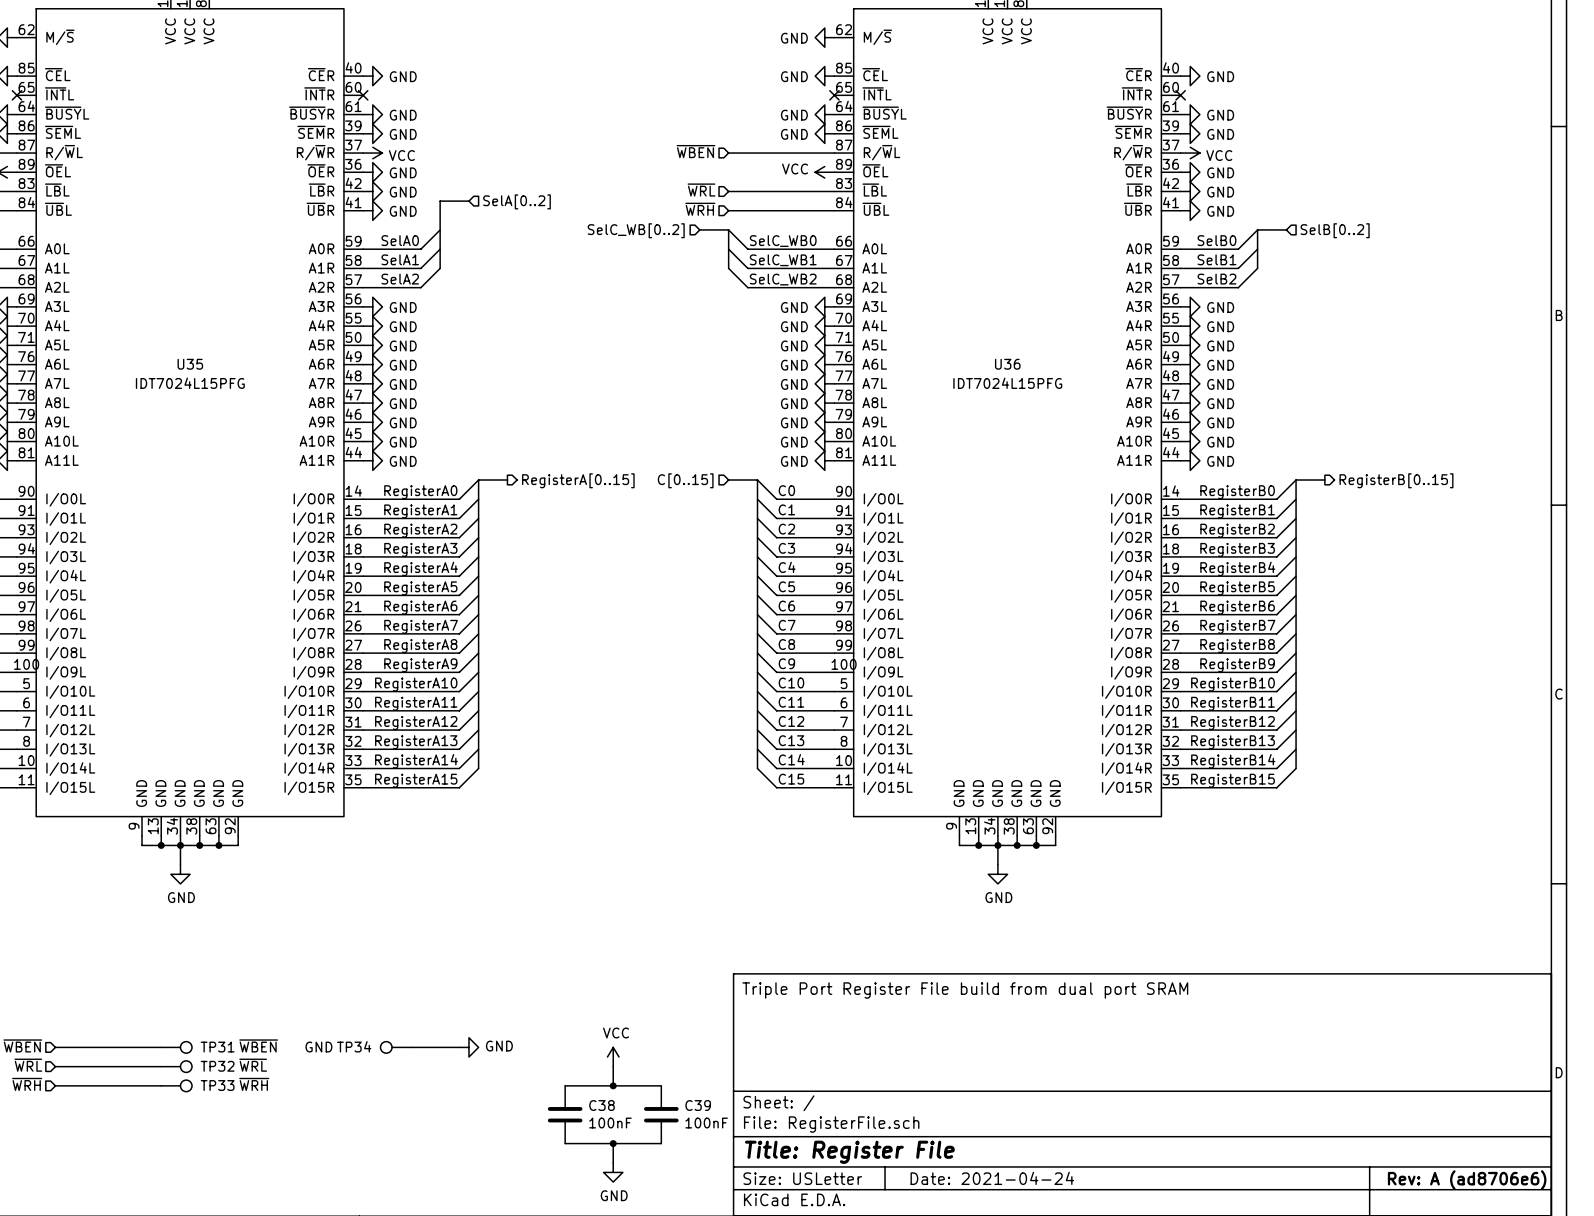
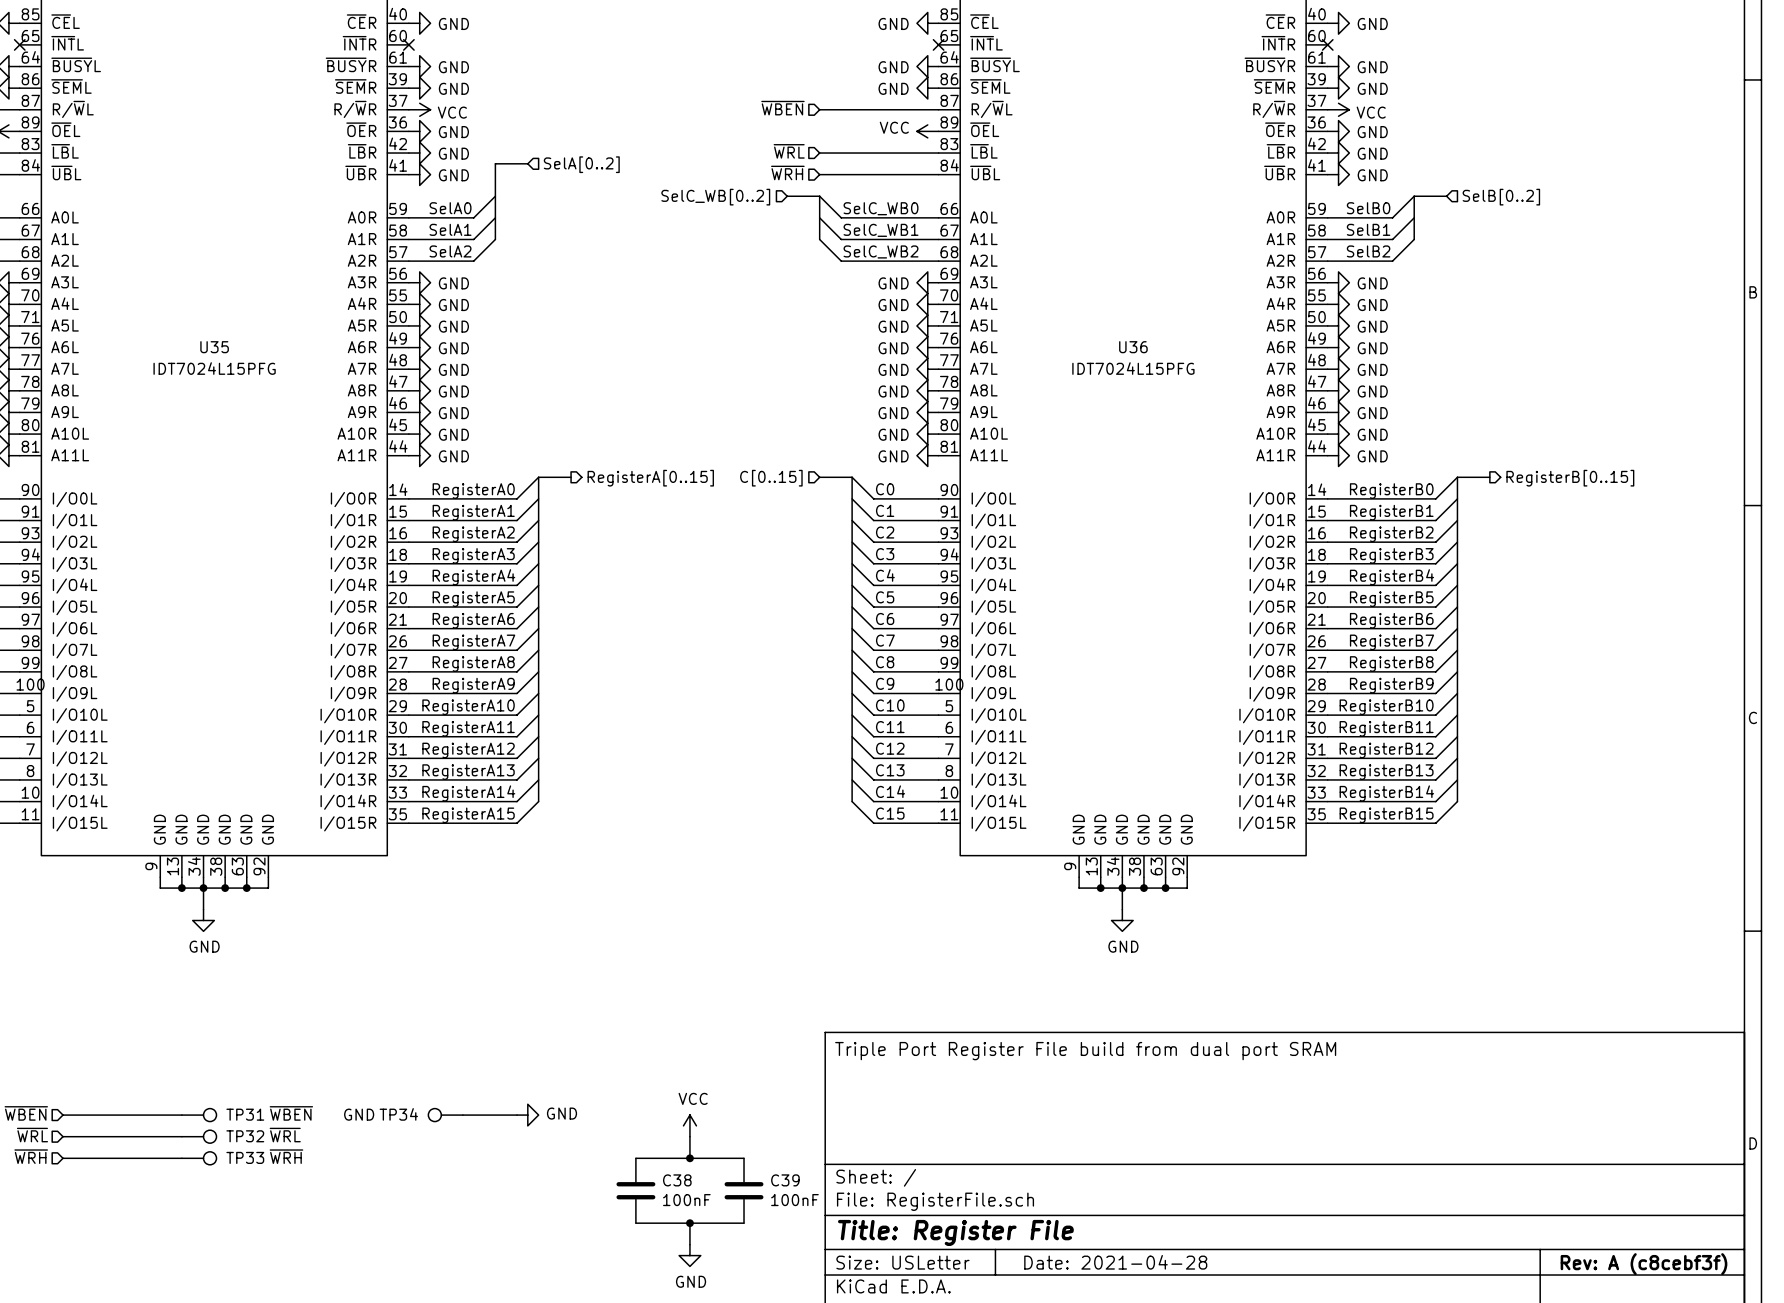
title block: Date: 2021-04-24 (992, 1178) -> Date: 2021-04-28 (1115, 1262)
title block: Rev: A (ad8706e6) (1467, 1180) -> Rev: A (c8cebf3f) (1644, 1264)

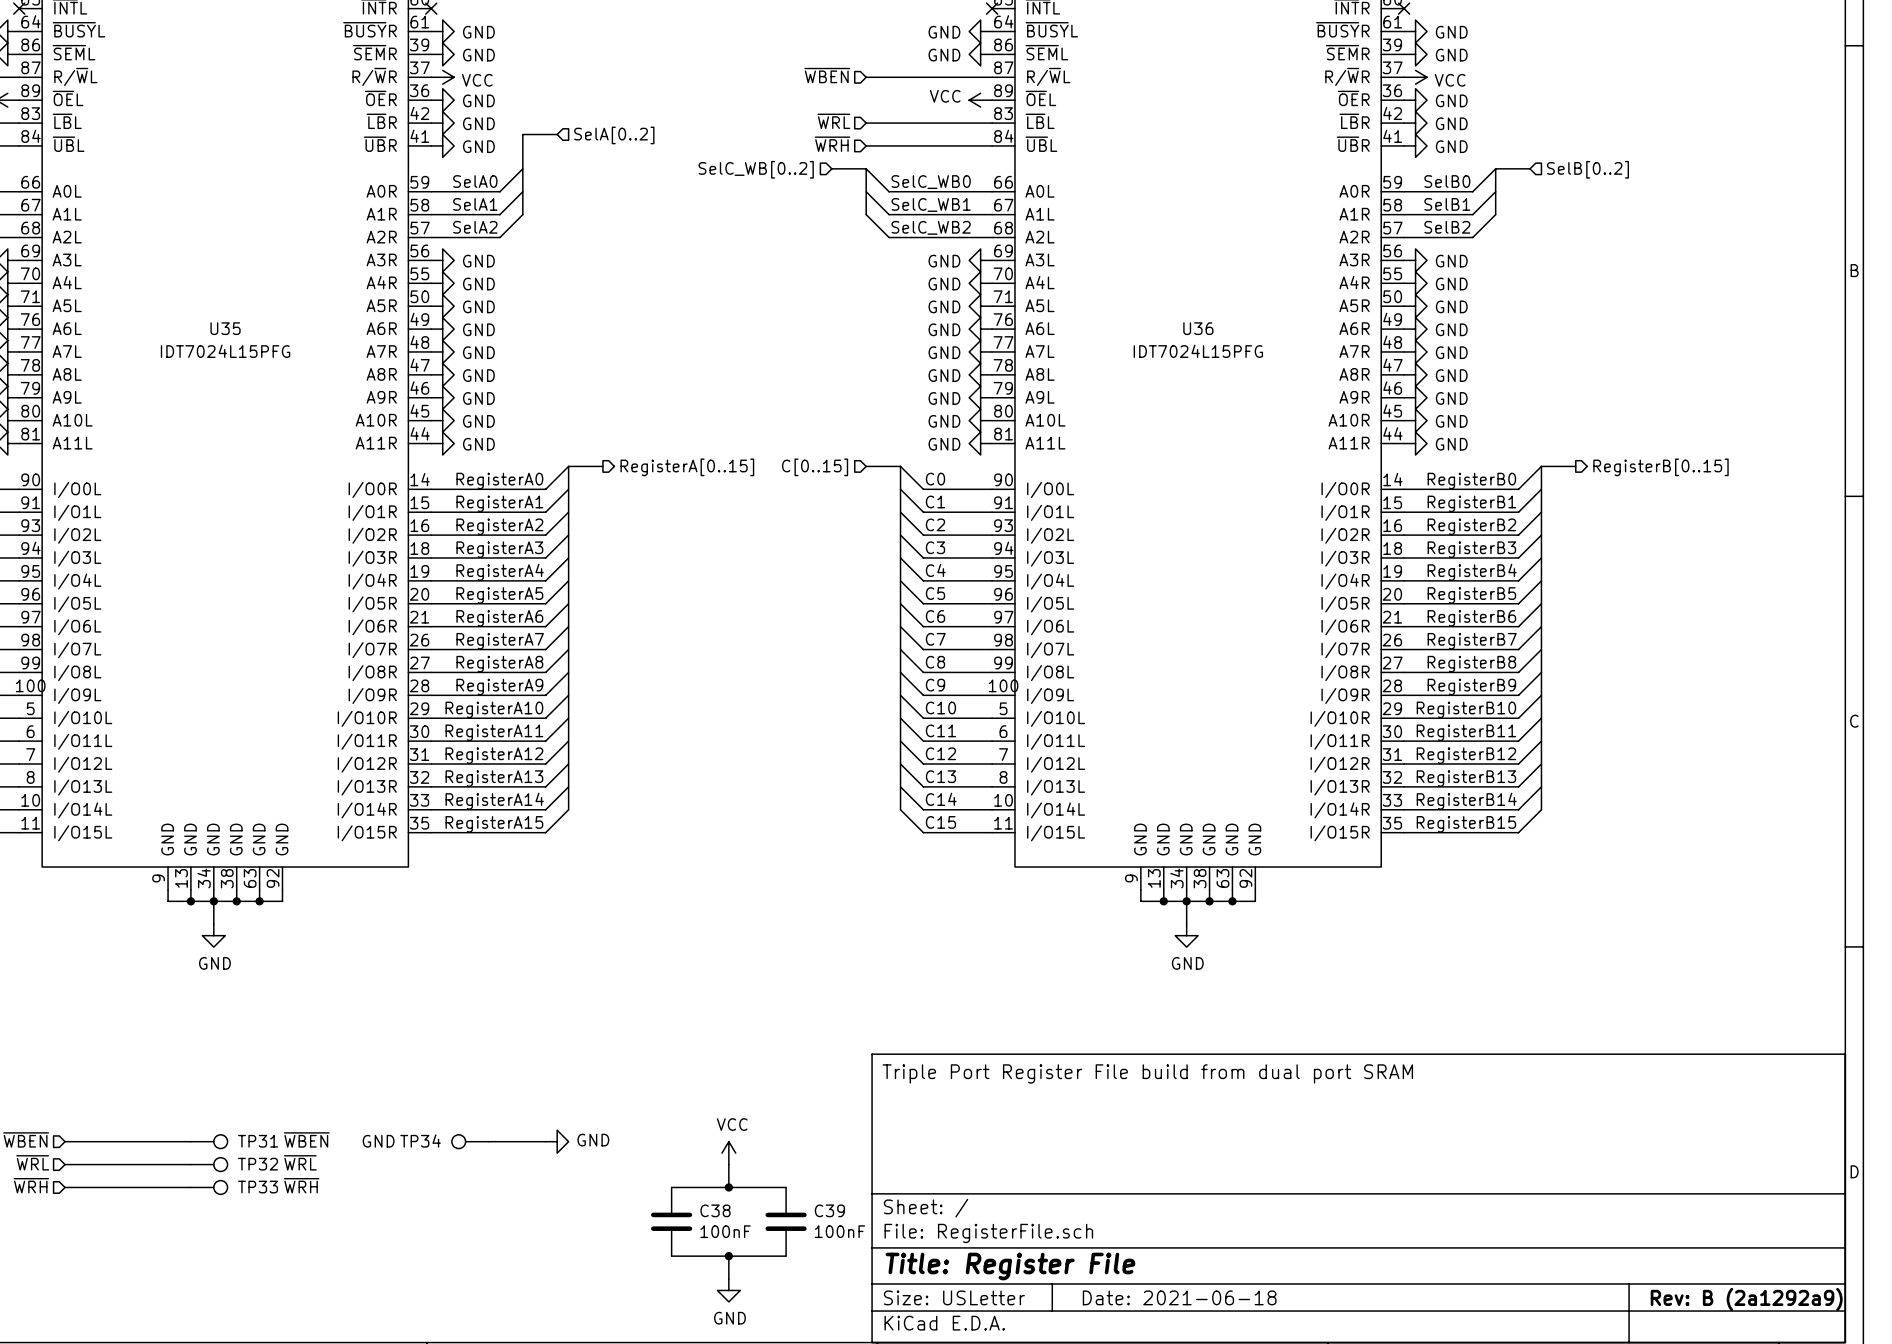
title block: Date: 2021-04-28 (1115, 1262) -> Date: 2021-06-18 (1179, 1297)
title block: Rev: A (c8cebf3f) (1644, 1264) -> Rev: B (2a1292a9) (1746, 1299)

